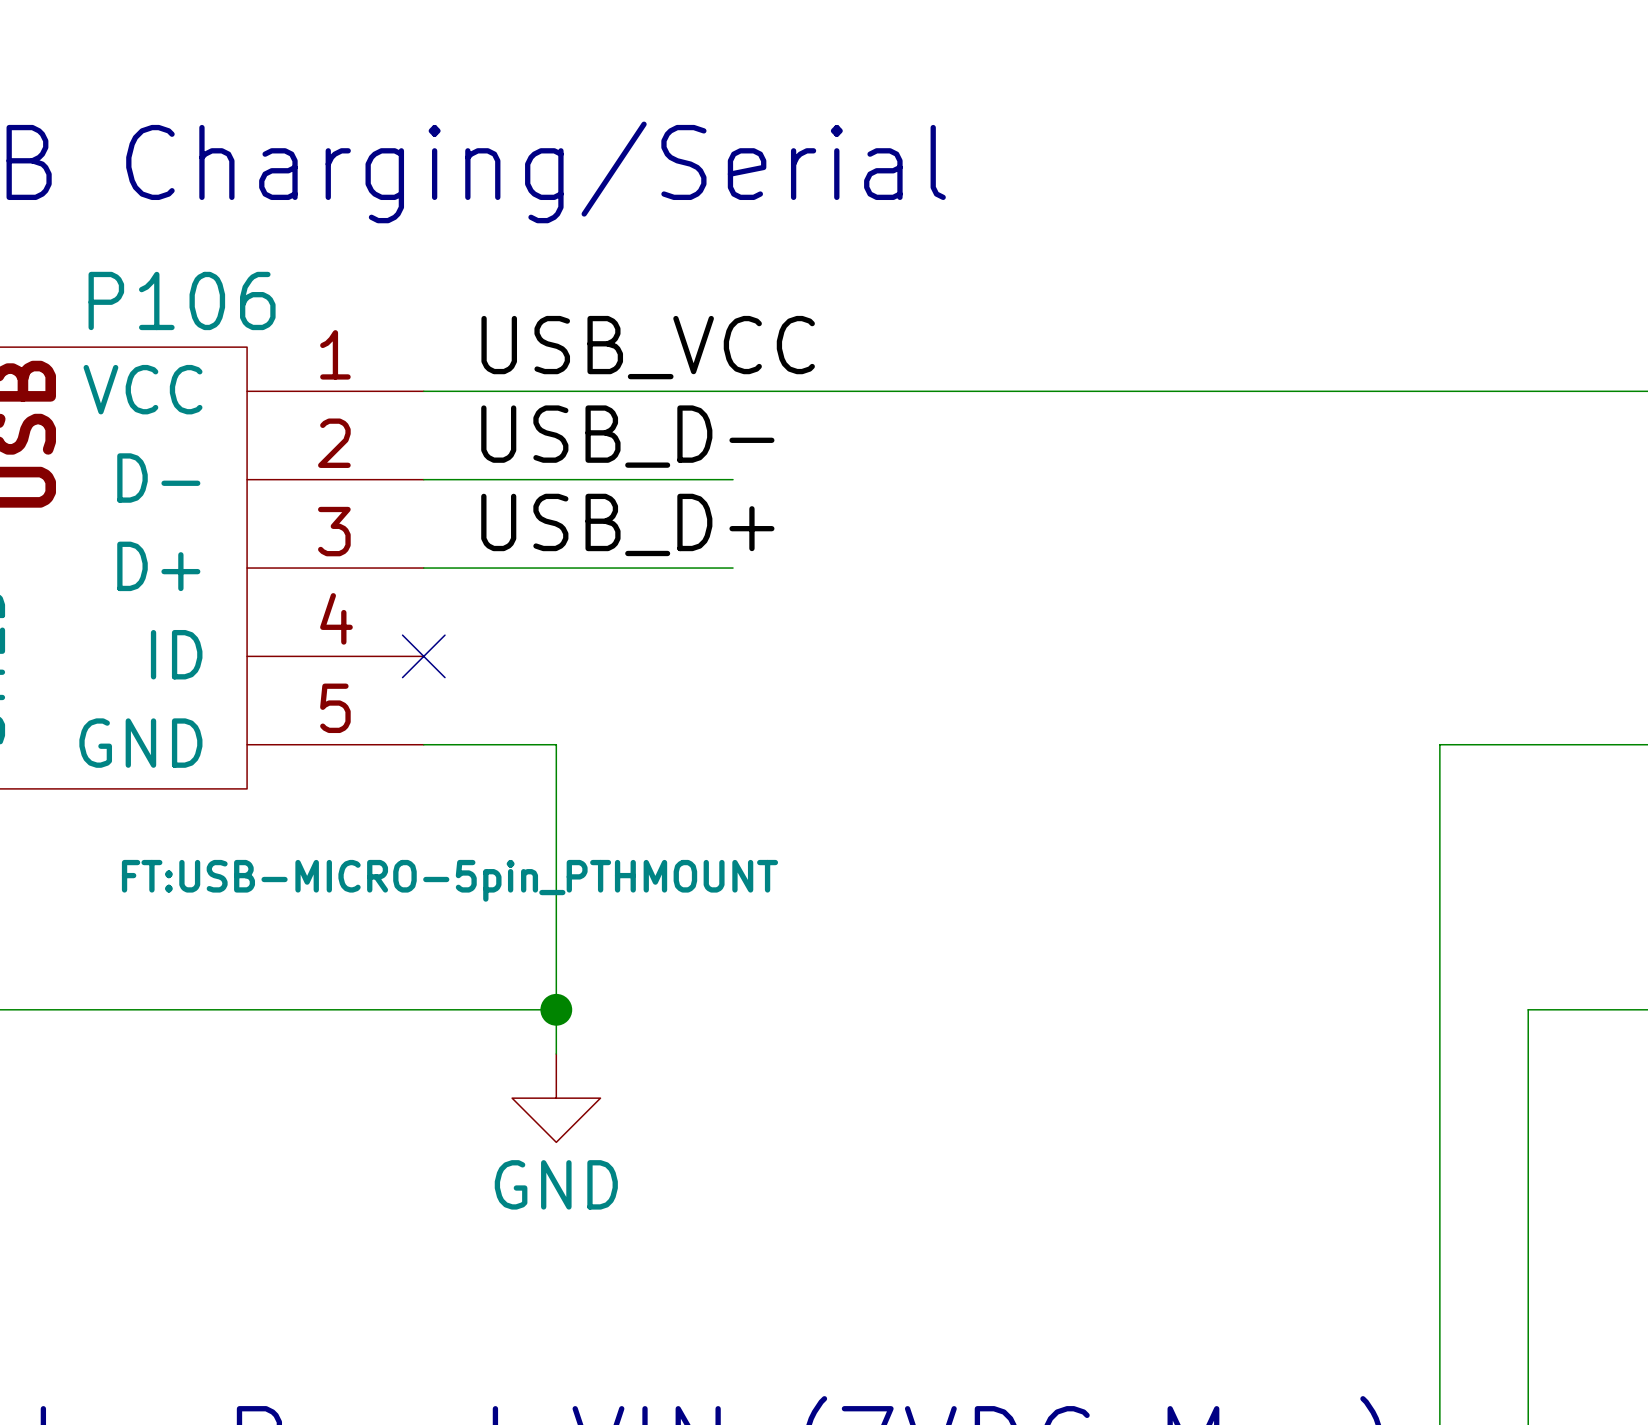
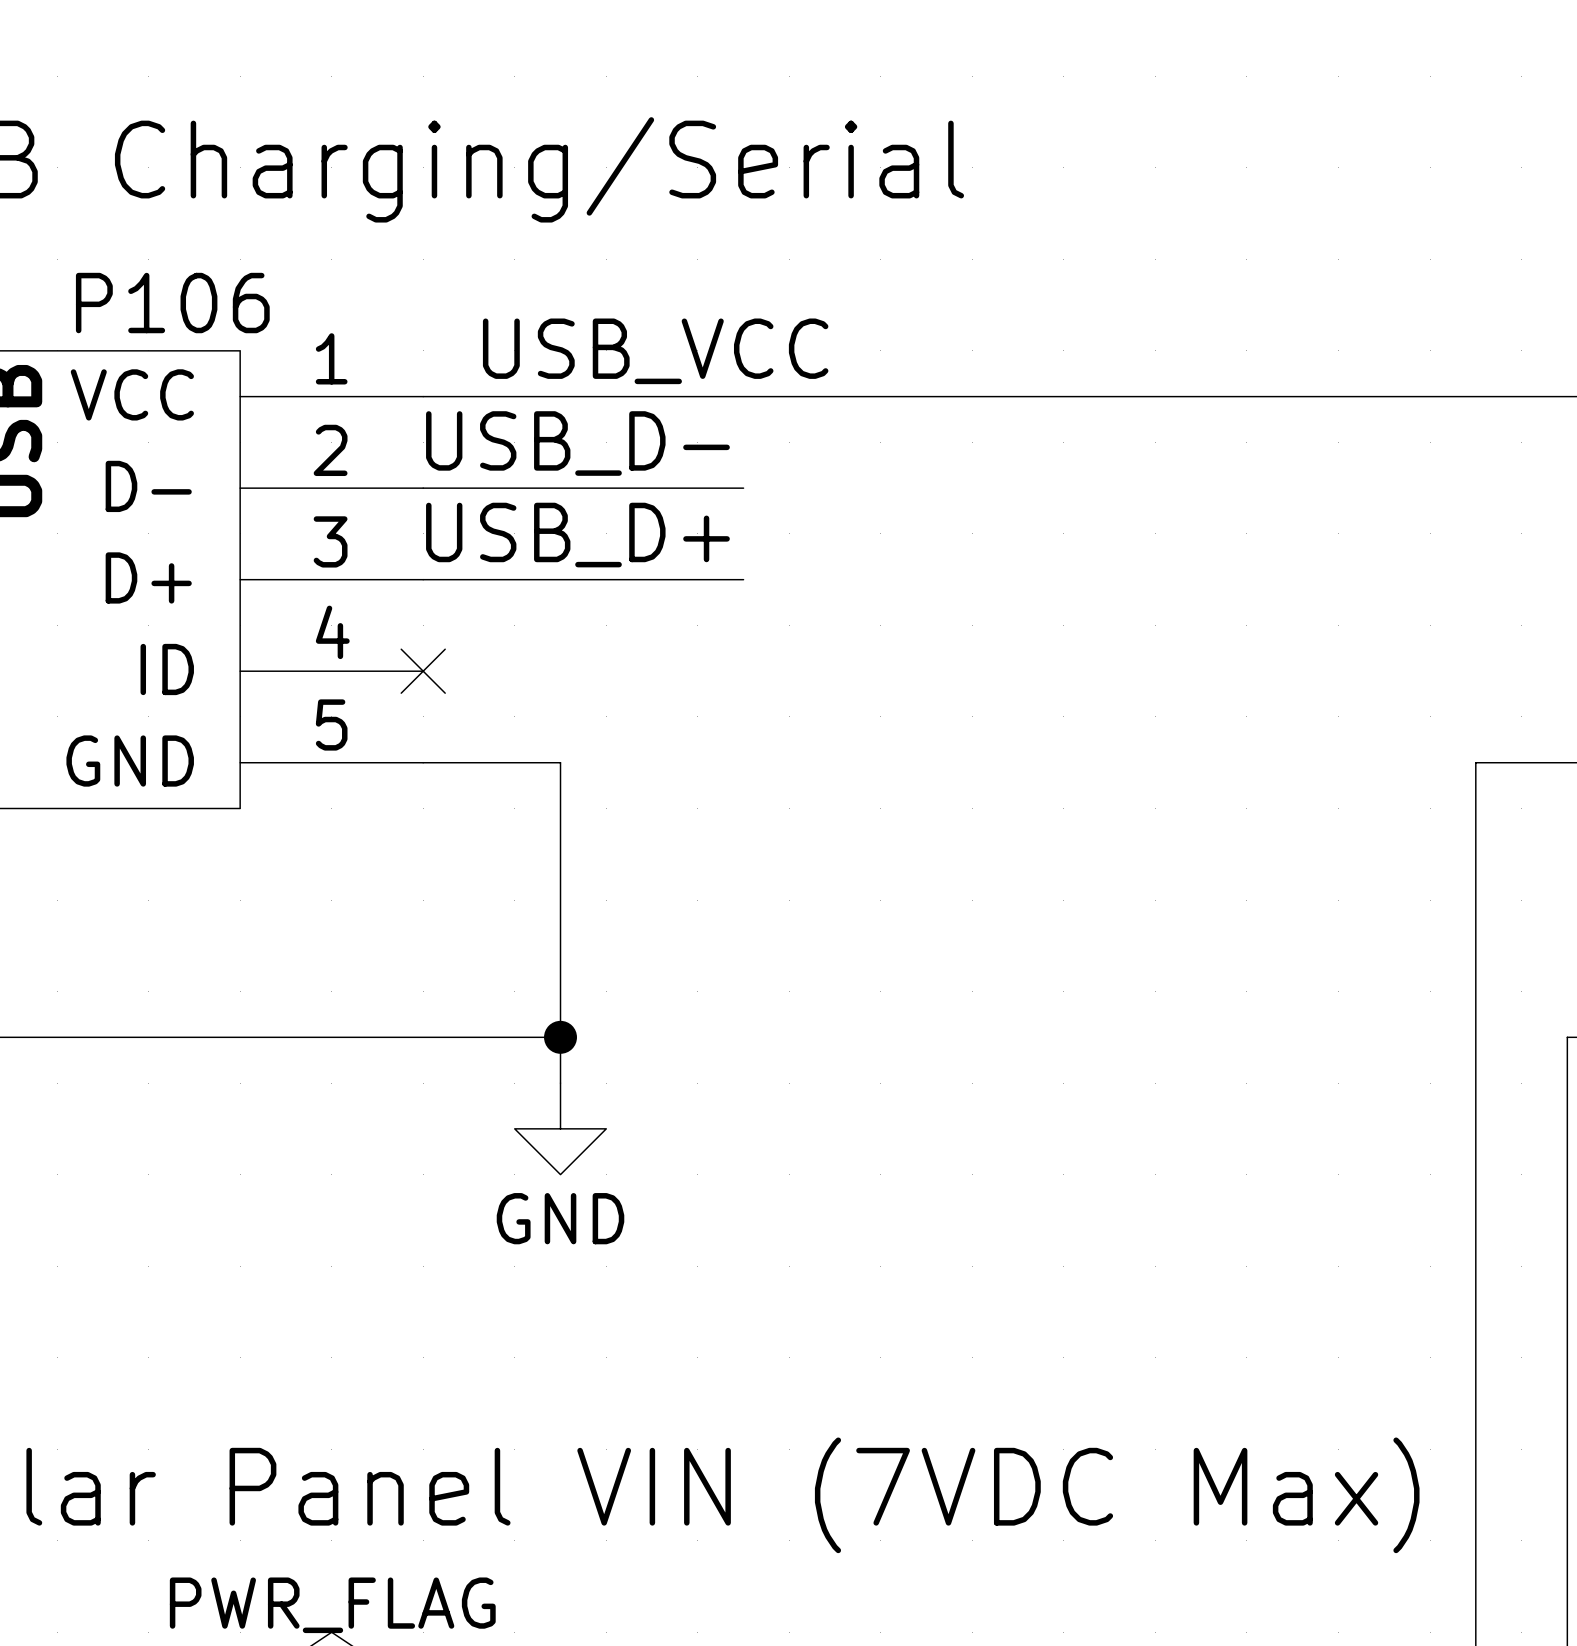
label position: USB_D- (627, 436) -> USB_D- (577, 443)
label position: USB_D+ (627, 524) -> USB_D+ (577, 535)
P106 text: FT:USB-MICRO-5pin_PTHMOUNT (449, 880) -> none

